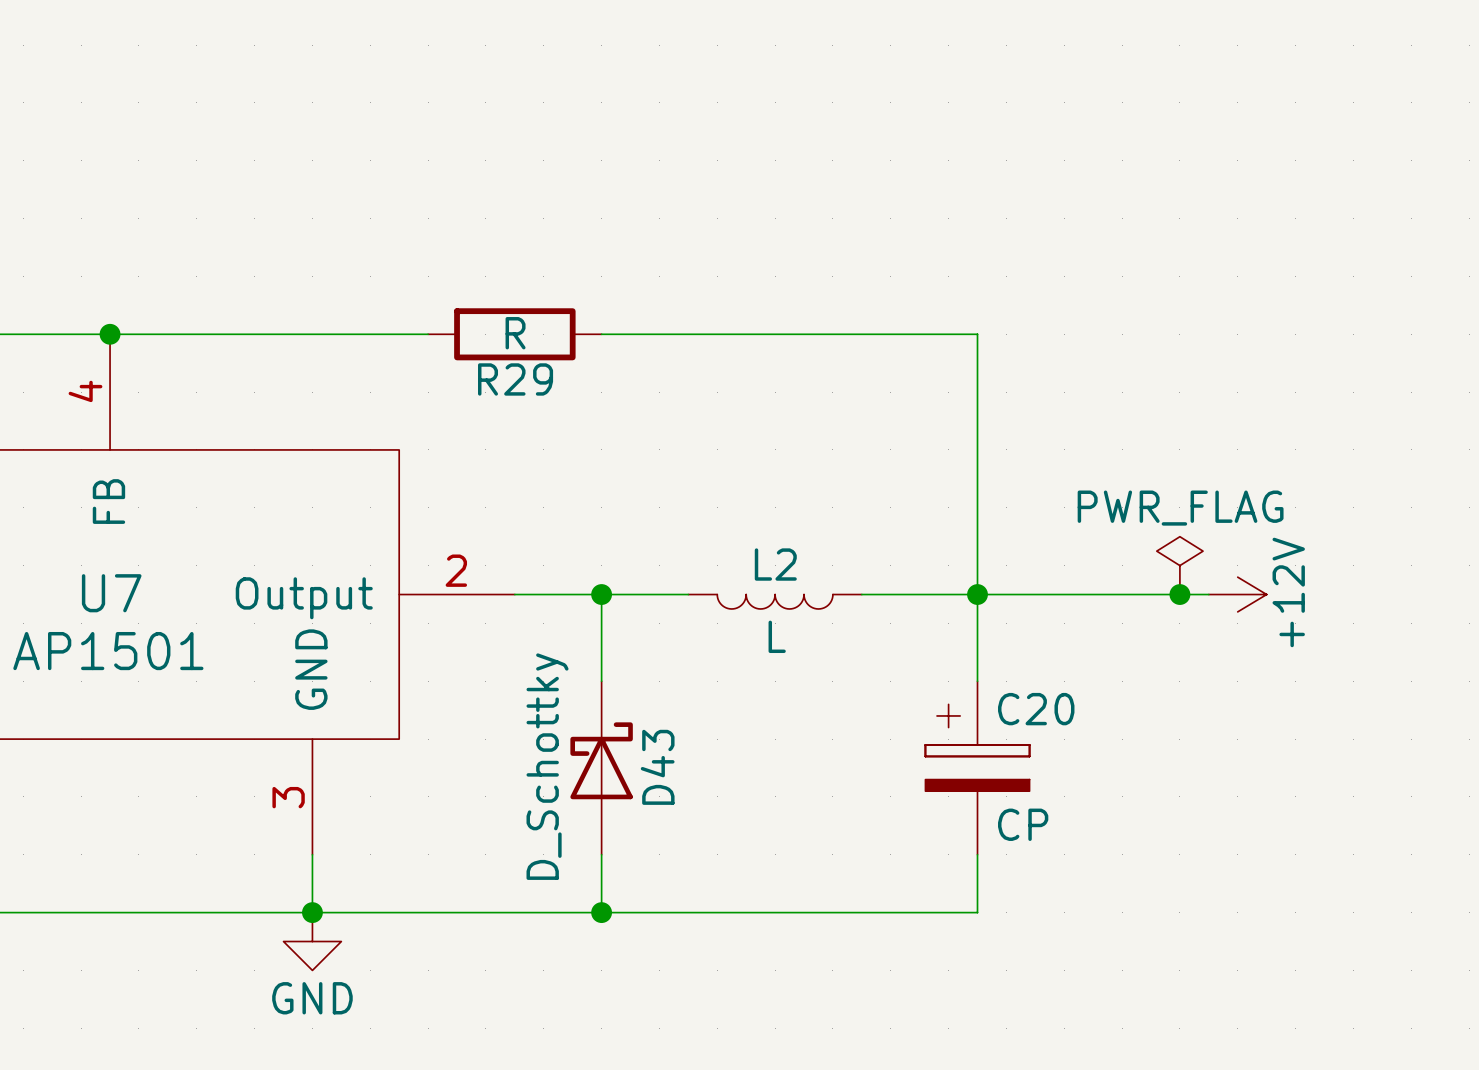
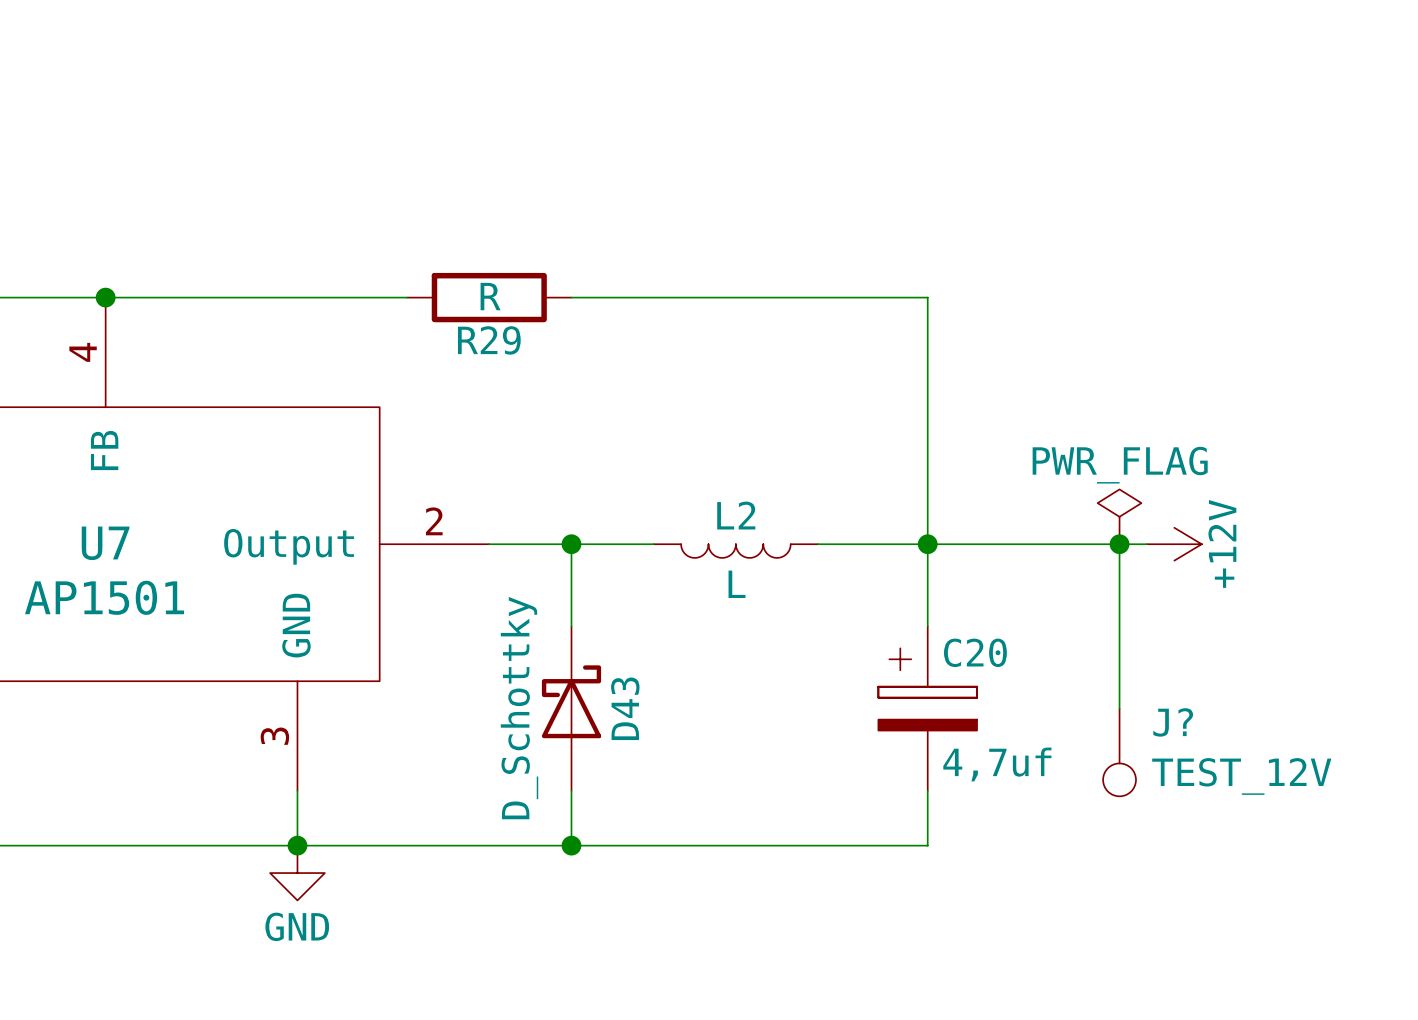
wire: none -> (1119, 544) (1119, 708)
J?: none -> TEST_12V (1119, 752)
C20 value: CP (1023, 824) -> 4,7uf (997, 764)

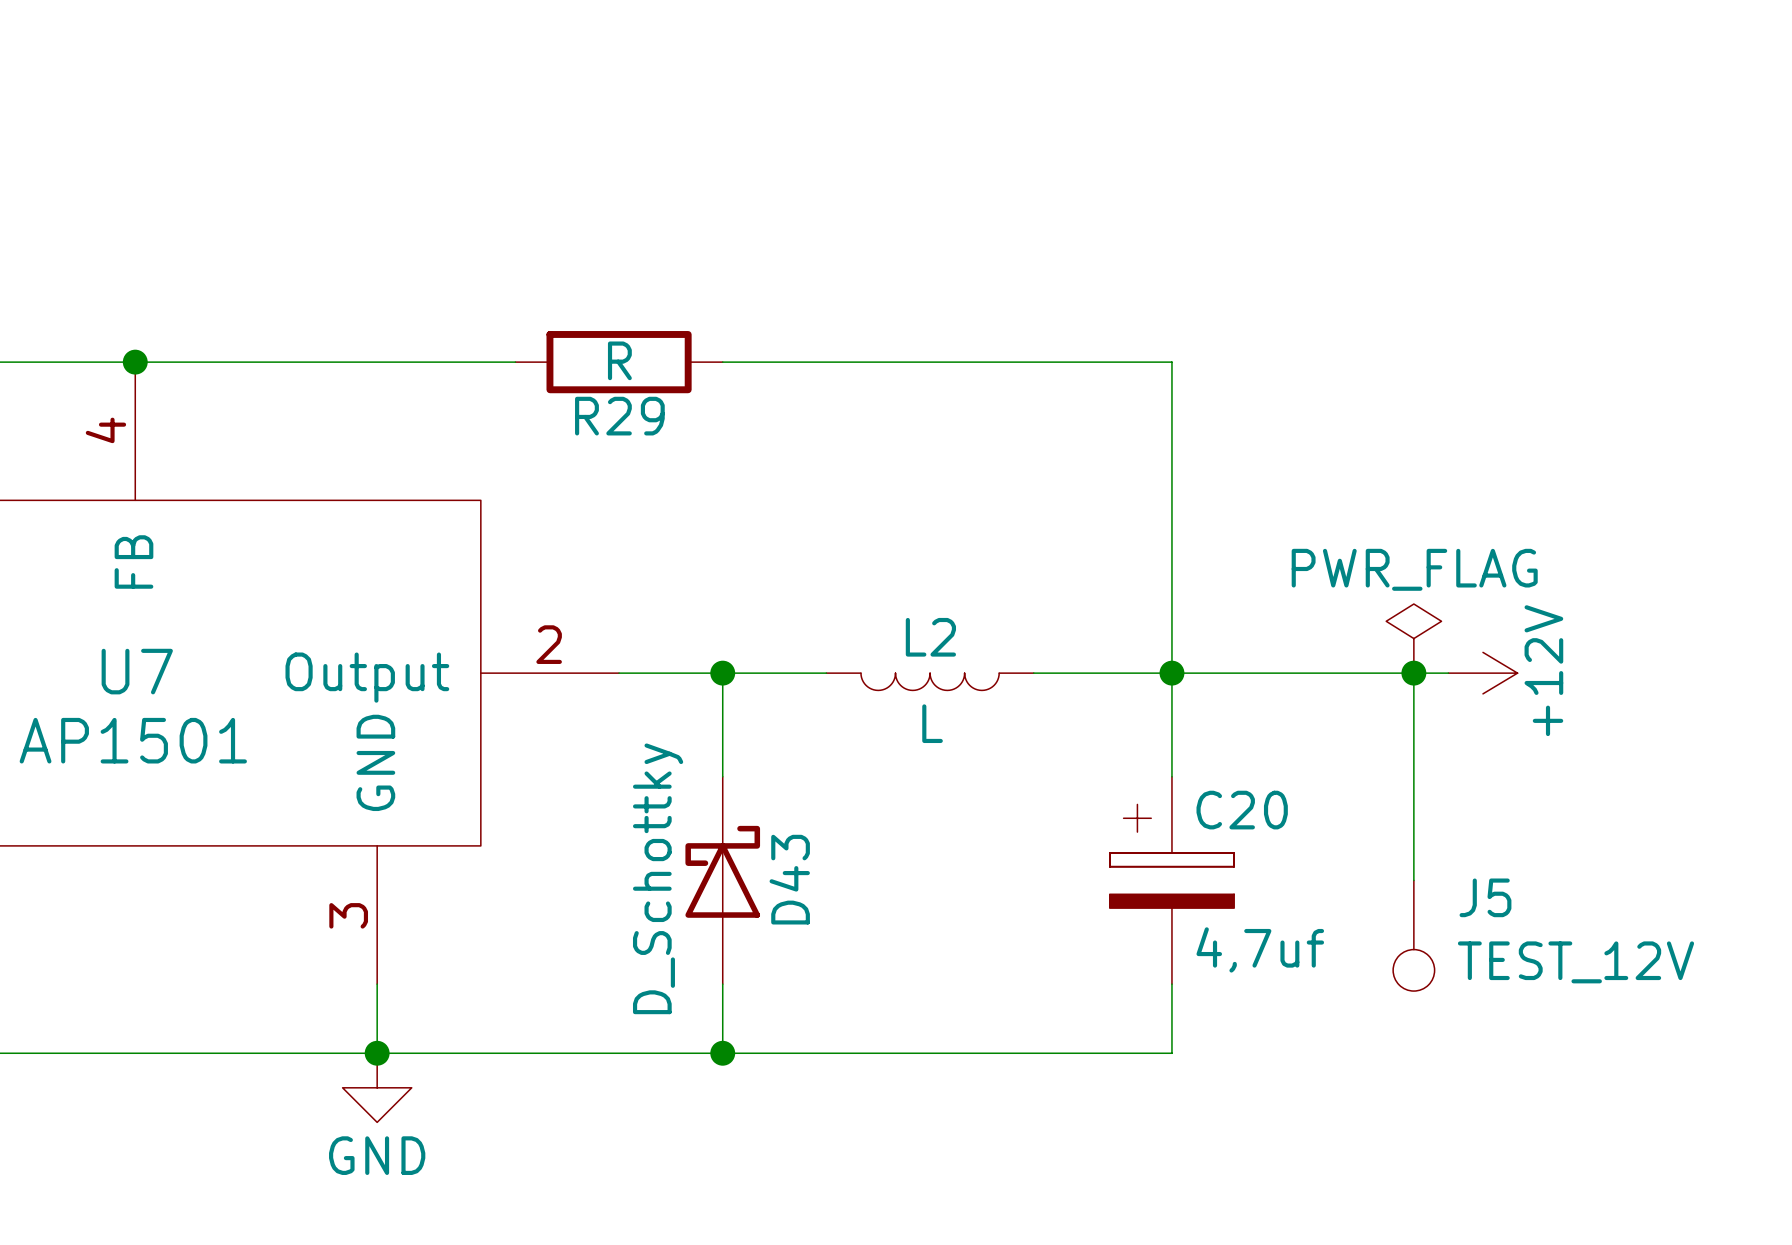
J? name: J? (1173, 722) -> J5 (1485, 897)

